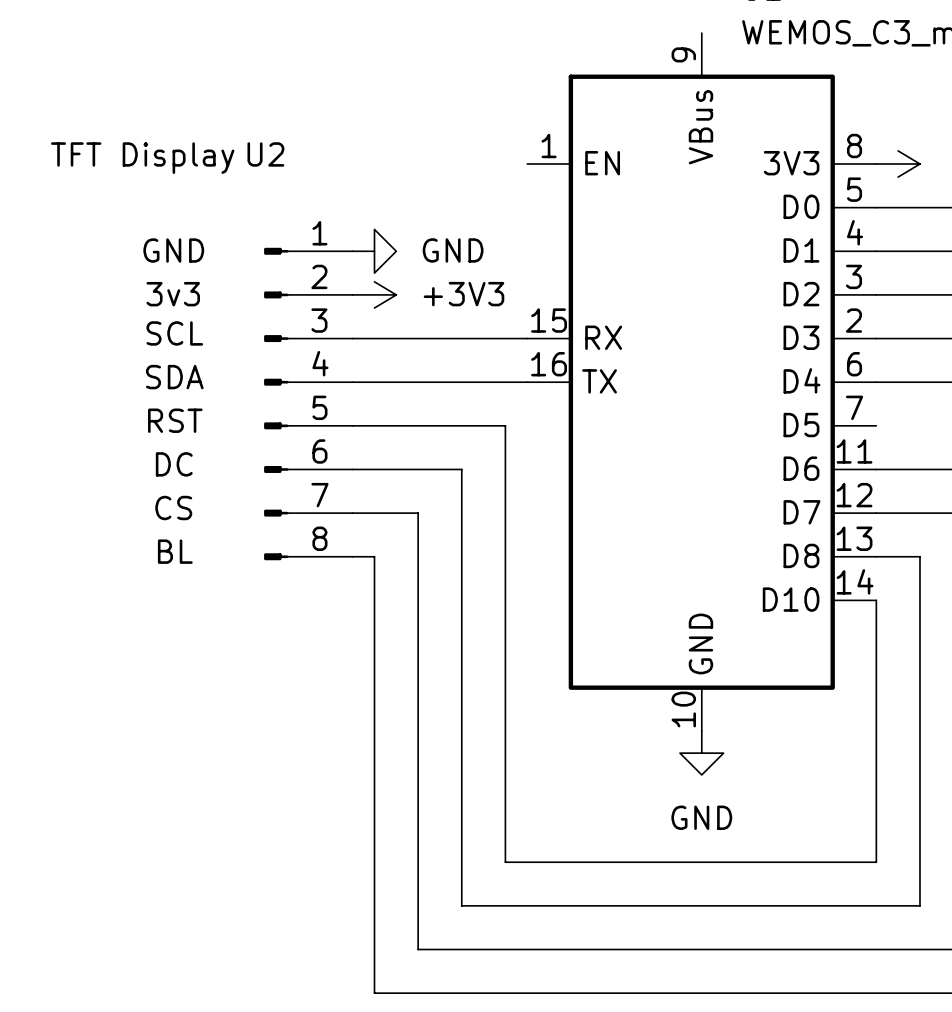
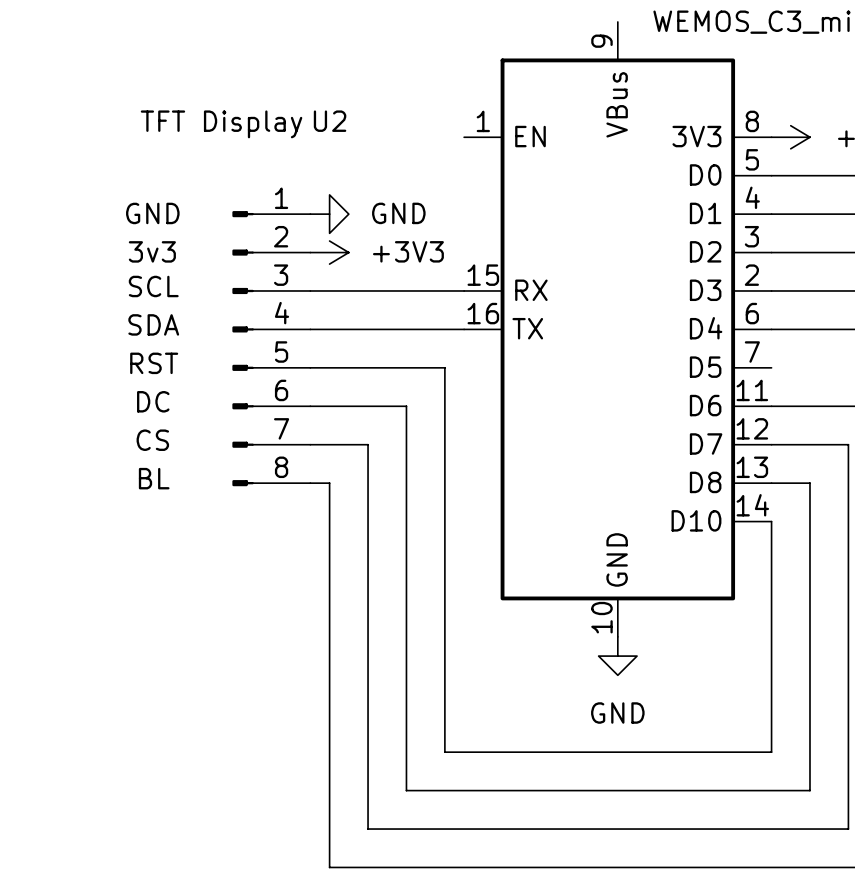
U2 name position: U2 (265, 154) -> U2 (330, 121)
U2 value position: TFT Display (142, 158) -> TFT Display (221, 124)

